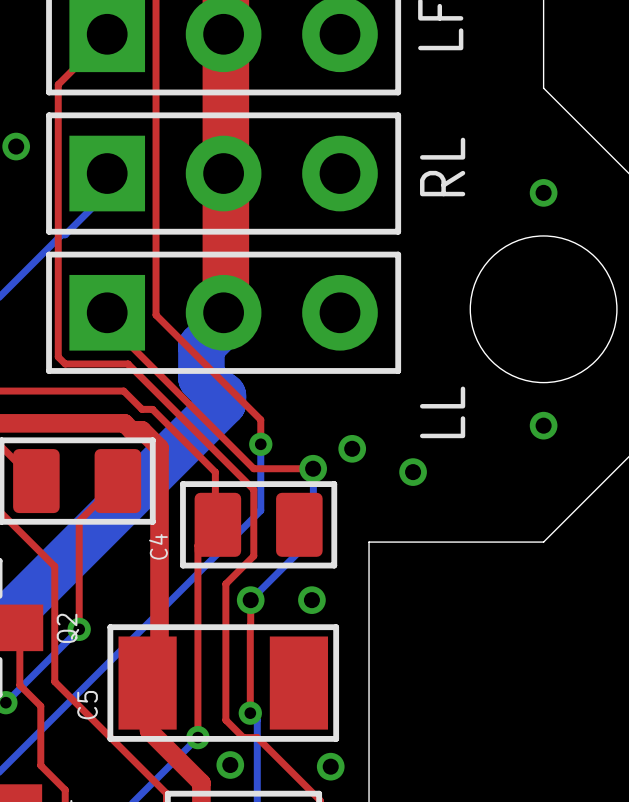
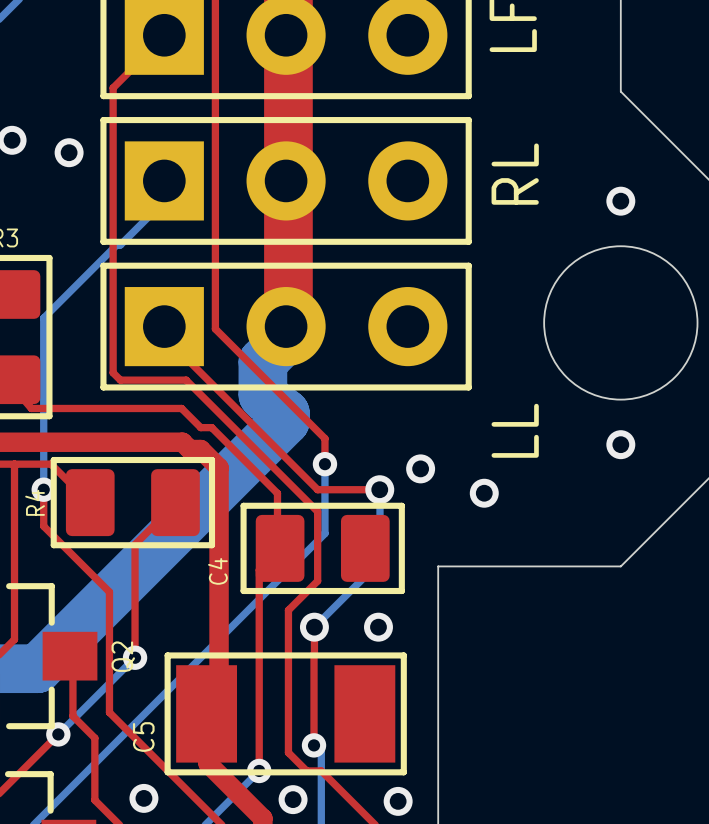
via: none -> (143, 798)

